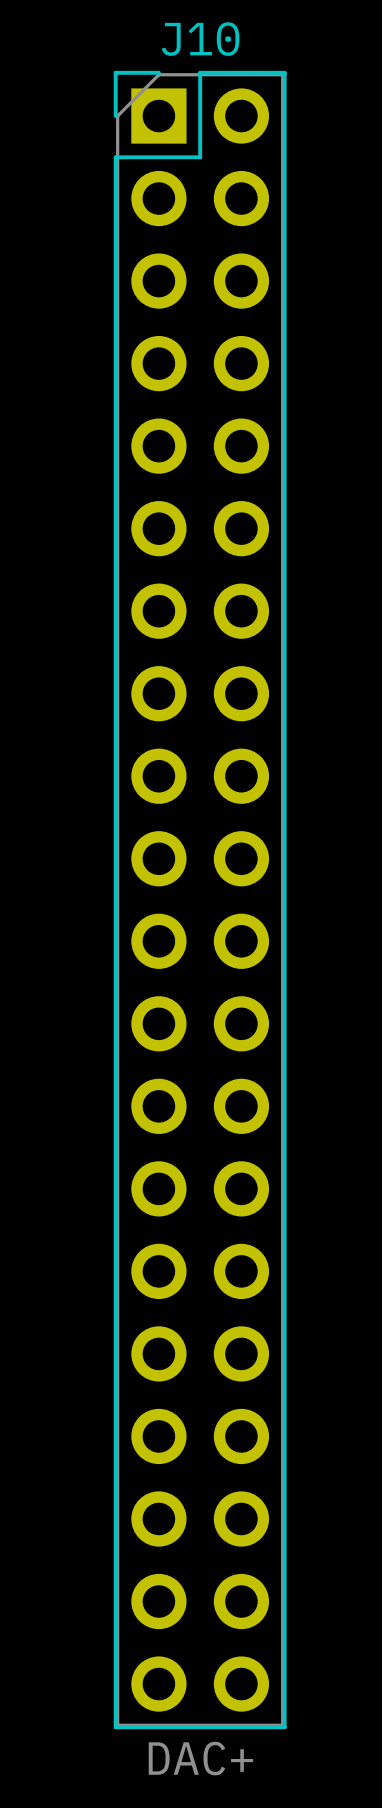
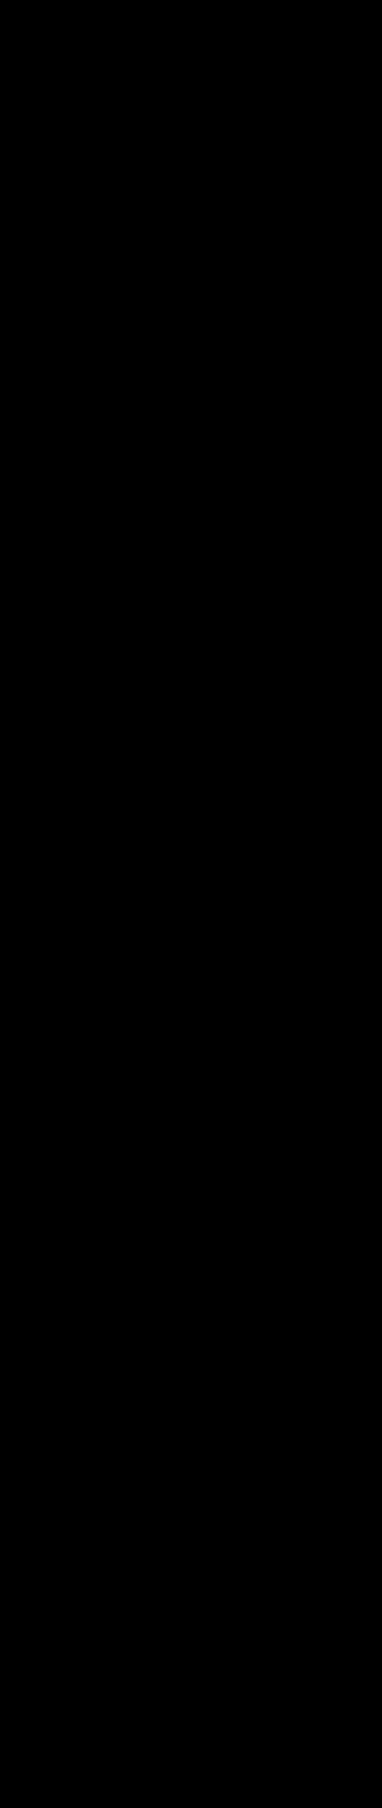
J10: DAC+ (200, 900) -> none

